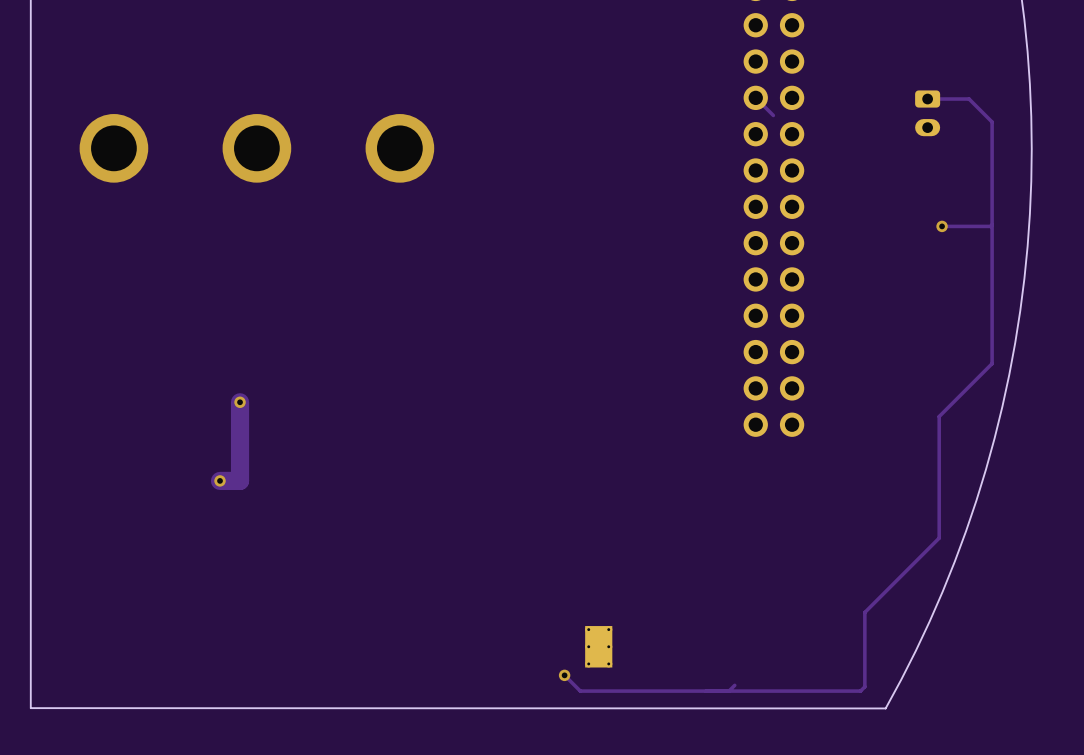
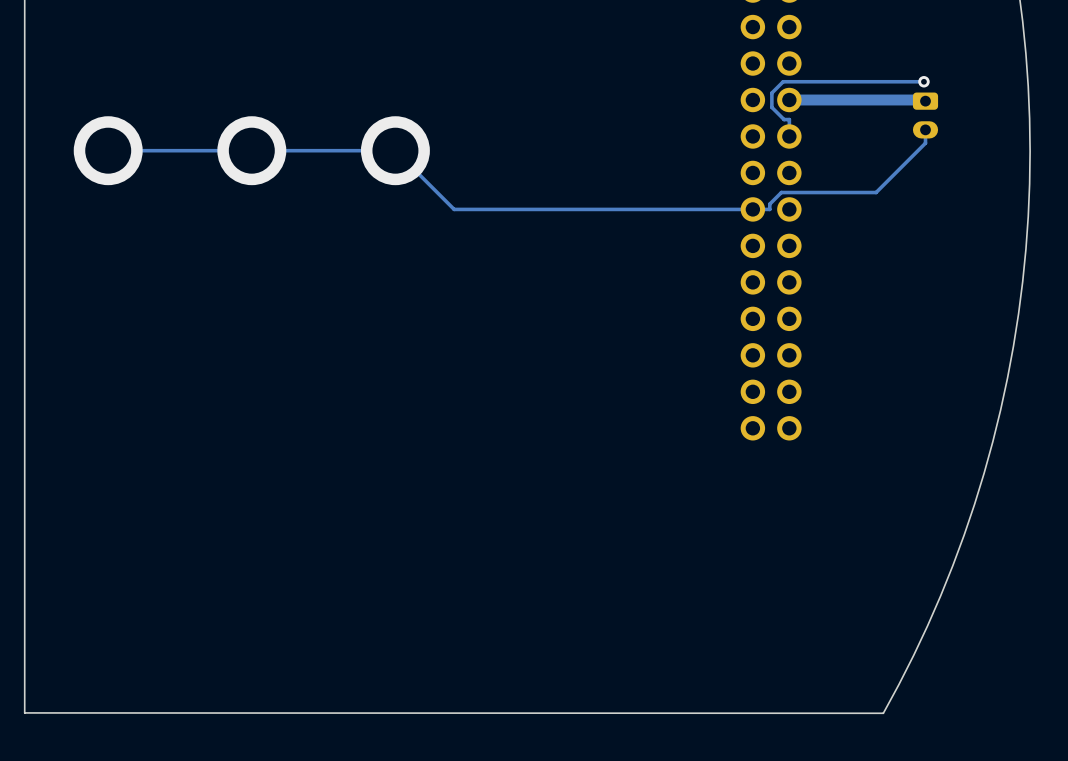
track: none -> (923, 81) (783, 81) (771, 93) (771, 107) (784, 119) (789, 119) (789, 136)
via: none -> (923, 81)
track: (755, 97) (773, 115) -> none
track: (927, 99) (969, 99) (992, 122) (992, 363) (939, 416) (939, 538) (864, 612) (864, 686) (860, 691) (580, 691) (564, 675) -> (925, 101) (789, 100)
track: none -> (925, 129) (925, 143) (876, 192) (781, 192) (769, 204) (769, 209) (454, 209) (395, 150) (108, 150)
track: (992, 224) (942, 226) -> none
via: (942, 226) -> none
track: (240, 402) (240, 480) (220, 480) -> none
via: (240, 402) -> none
via: (220, 480) -> none
part: (598, 646) -> none
via: (564, 675) -> none
track: (734, 685) (729, 691) -> none

